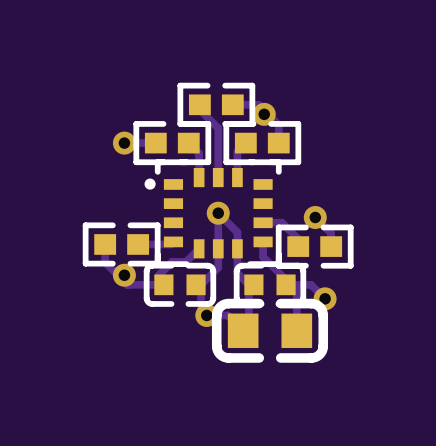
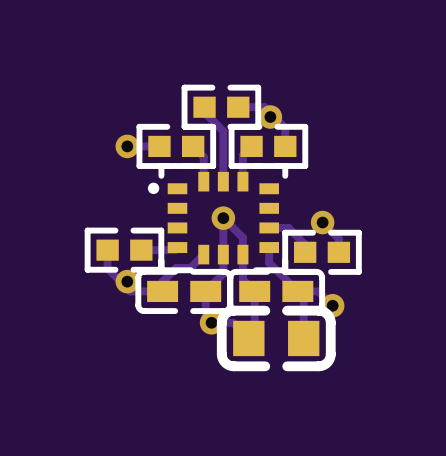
part footprint: [143, 262, 217, 307] -> [135, 268, 233, 314]
part footprint: [233, 262, 307, 307] -> [227, 268, 326, 314]

